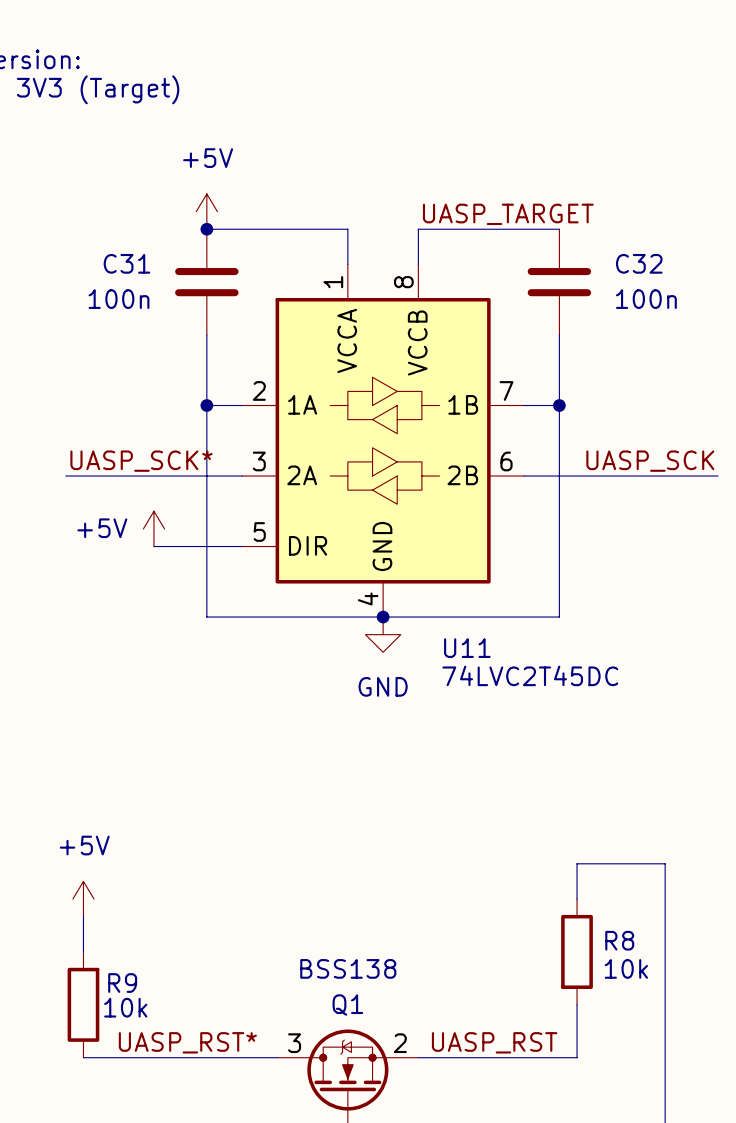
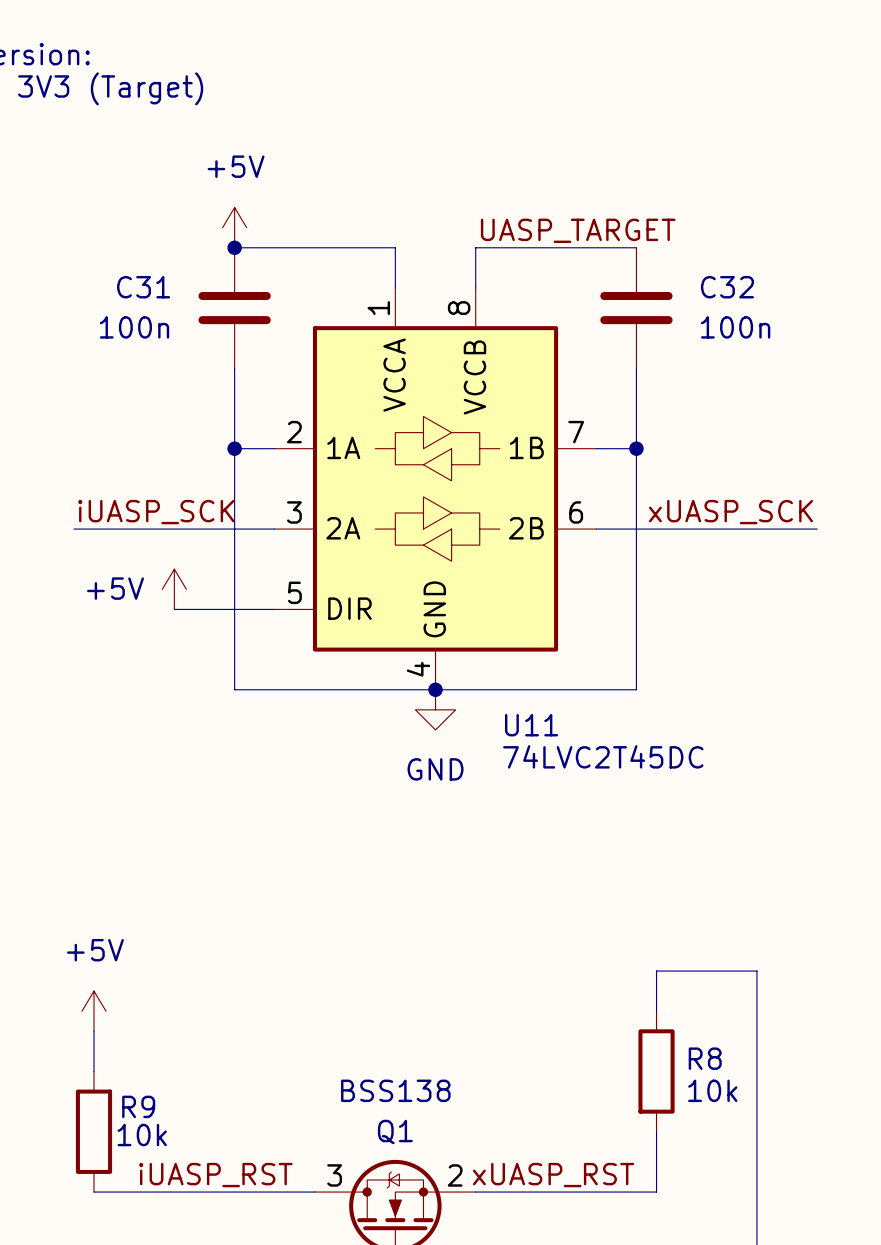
label: UASP_SCK* (141, 461) -> iUASP_SCK (156, 512)
label: UASP_SCK (650, 461) -> xUASP_SCK (731, 512)
label: UASP_RST* (187, 1042) -> iUASP_RST (215, 1175)
label: UASP_RST (494, 1042) -> xUASP_RST (553, 1175)

